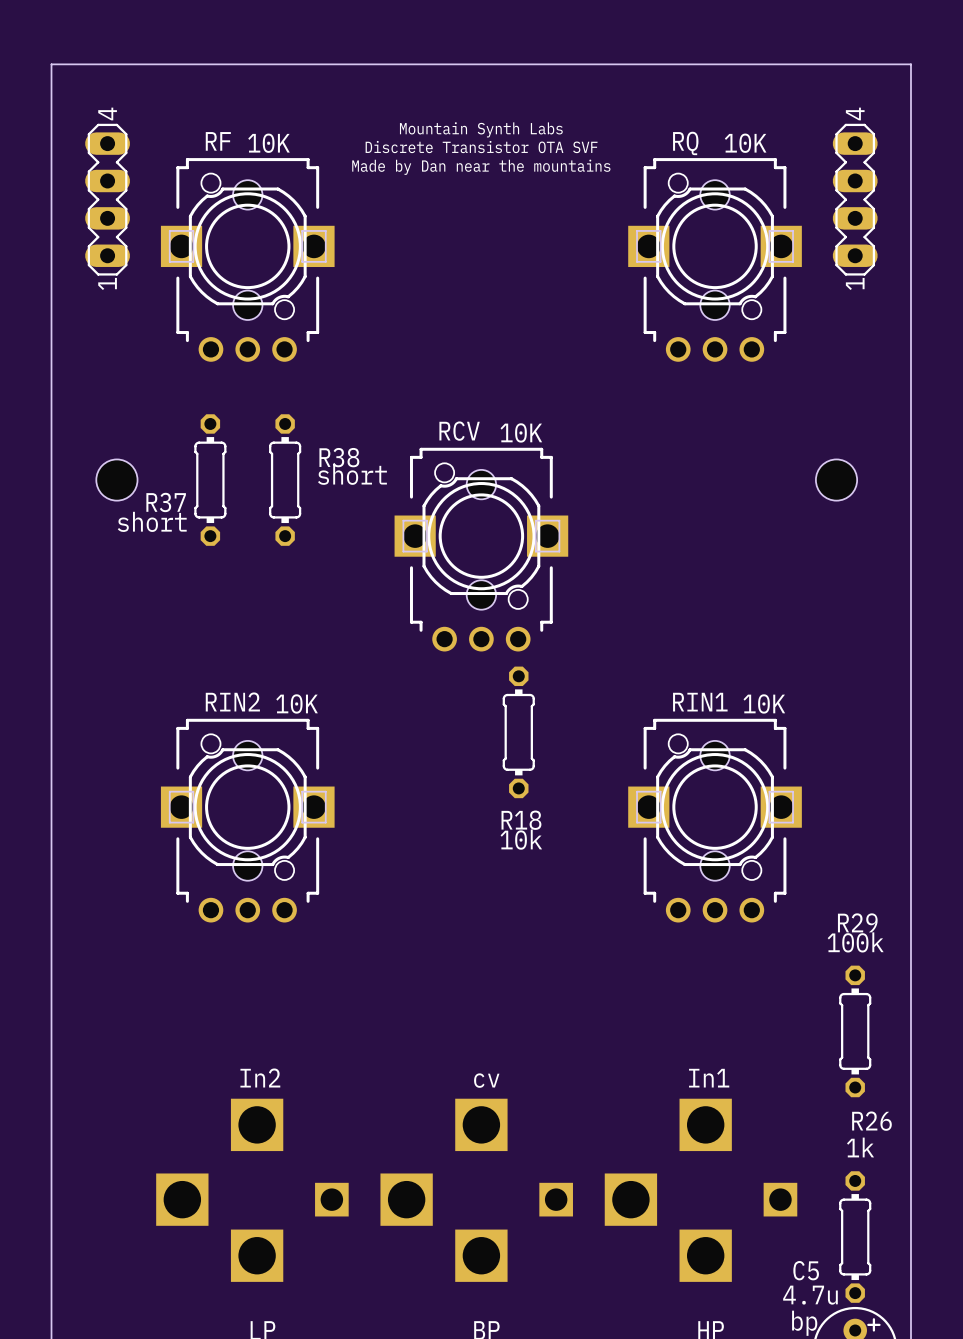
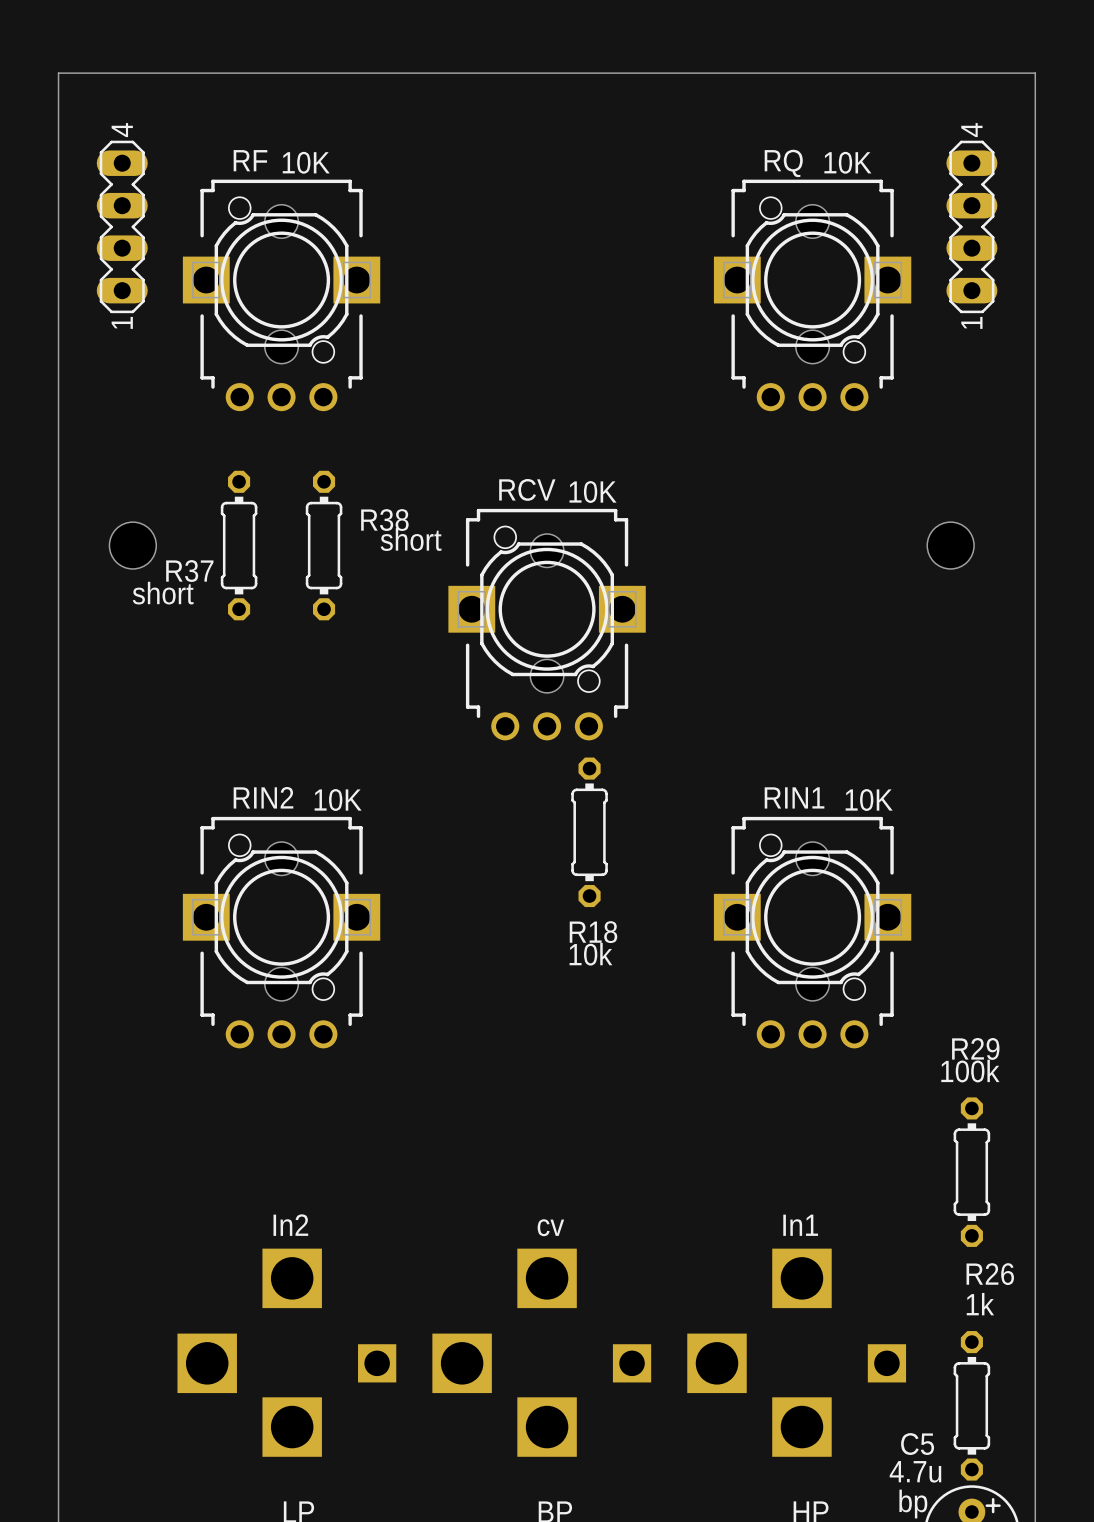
text: Mountain Synth Labs (481, 129) -> none
text: Discrete Transistor OTA SVF (481, 147) -> none
text: Made by Dan near the mountains (481, 167) -> none

